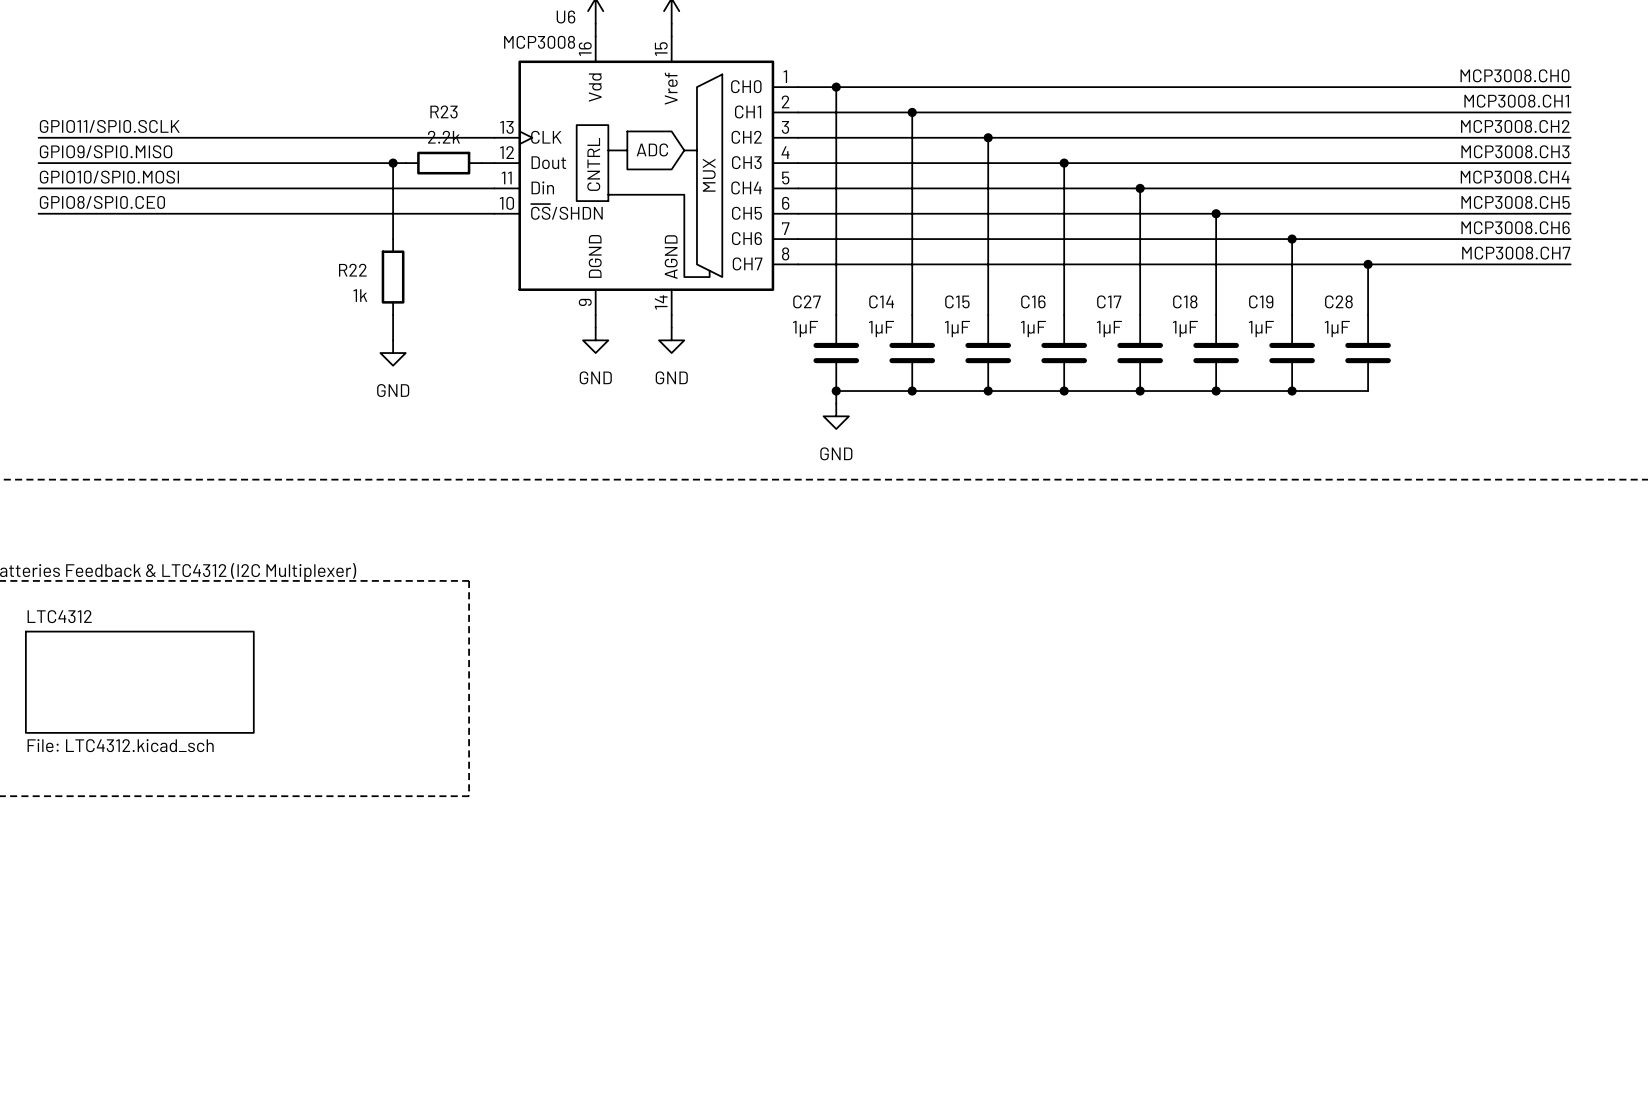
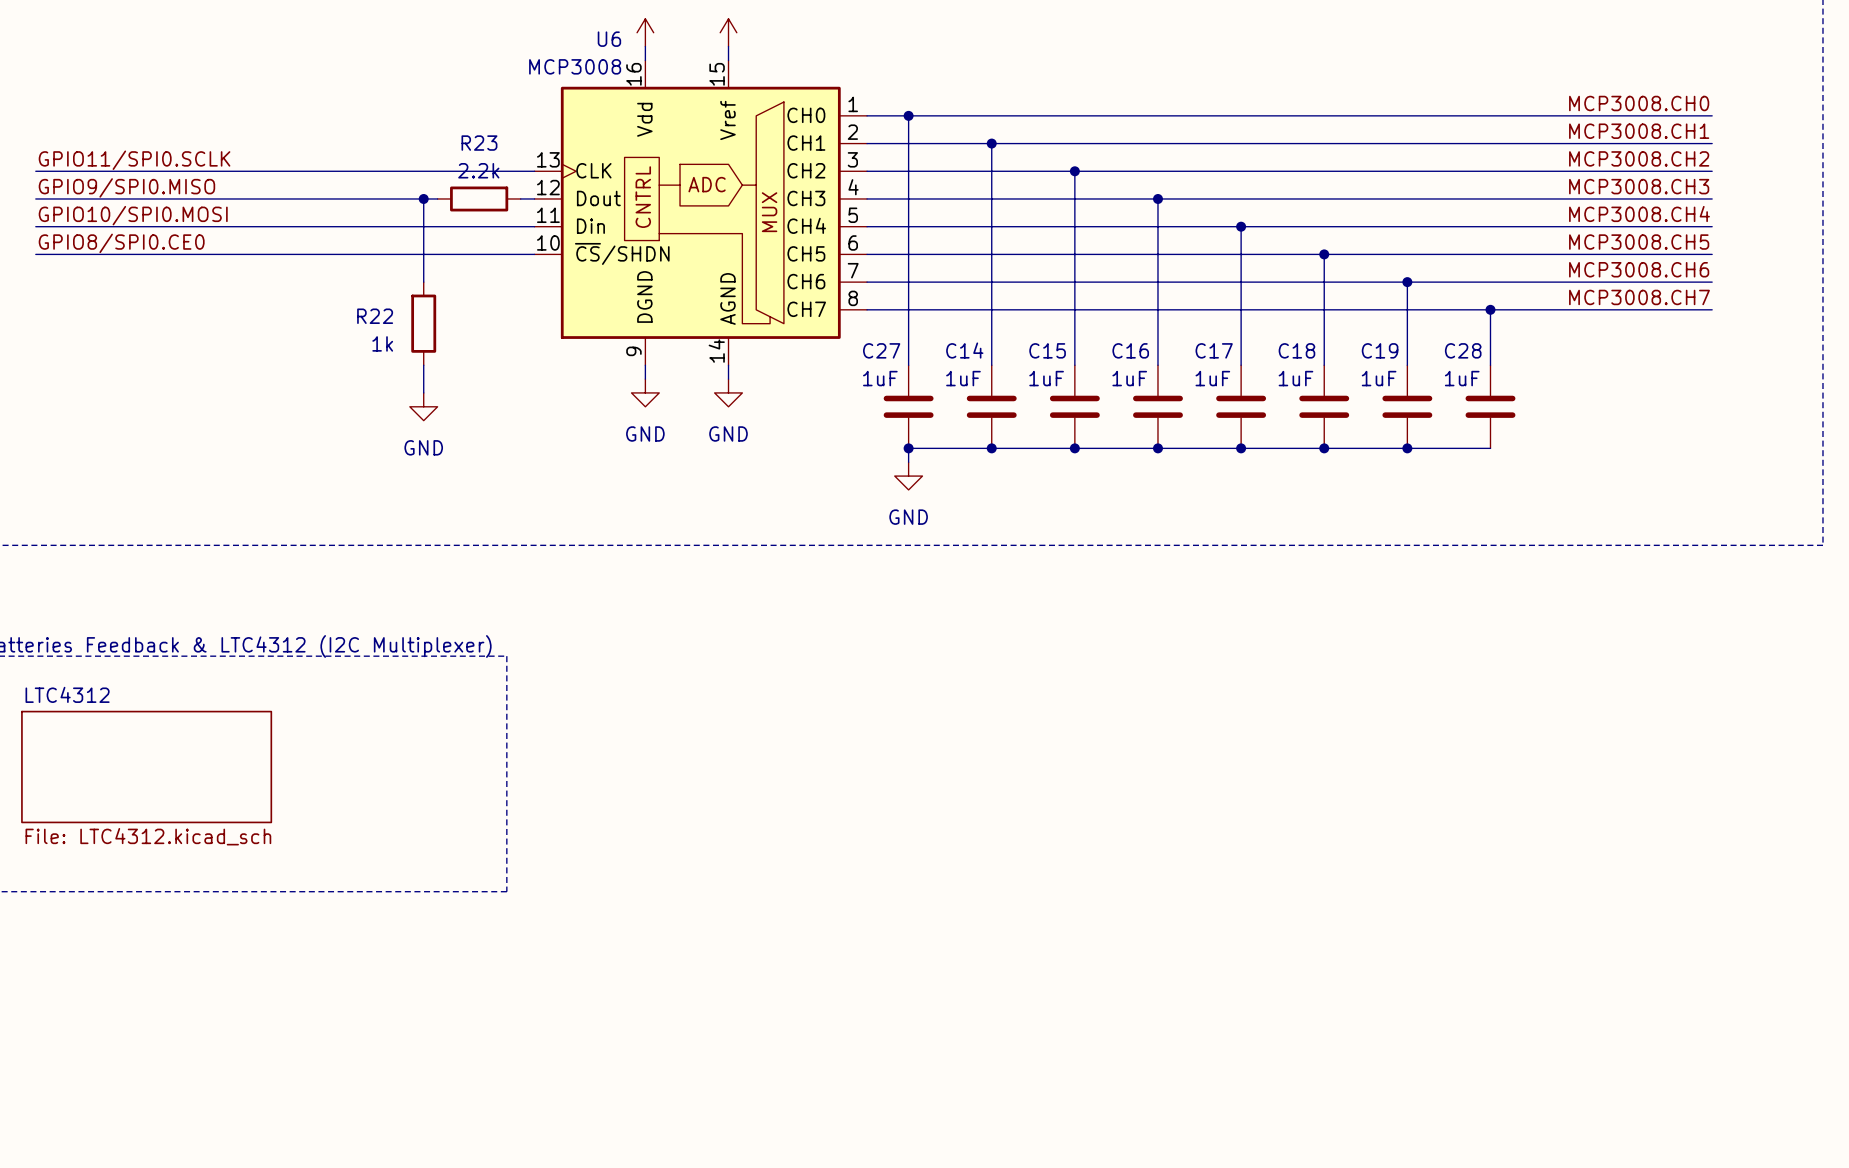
C27 value: 1µF (805, 329) -> 1uF (880, 378)
C14 value: 1µF (881, 329) -> 1uF (963, 378)
C15 value: 1µF (957, 329) -> 1uF (1046, 378)
C16 value: 1µF (1033, 329) -> 1uF (1129, 378)
C17 value: 1µF (1109, 329) -> 1uF (1212, 378)
C18 value: 1µF (1185, 329) -> 1uF (1295, 378)
C19 value: 1µF (1261, 329) -> 1uF (1379, 378)
C28 value: 1µF (1337, 329) -> 1uF (1462, 378)

